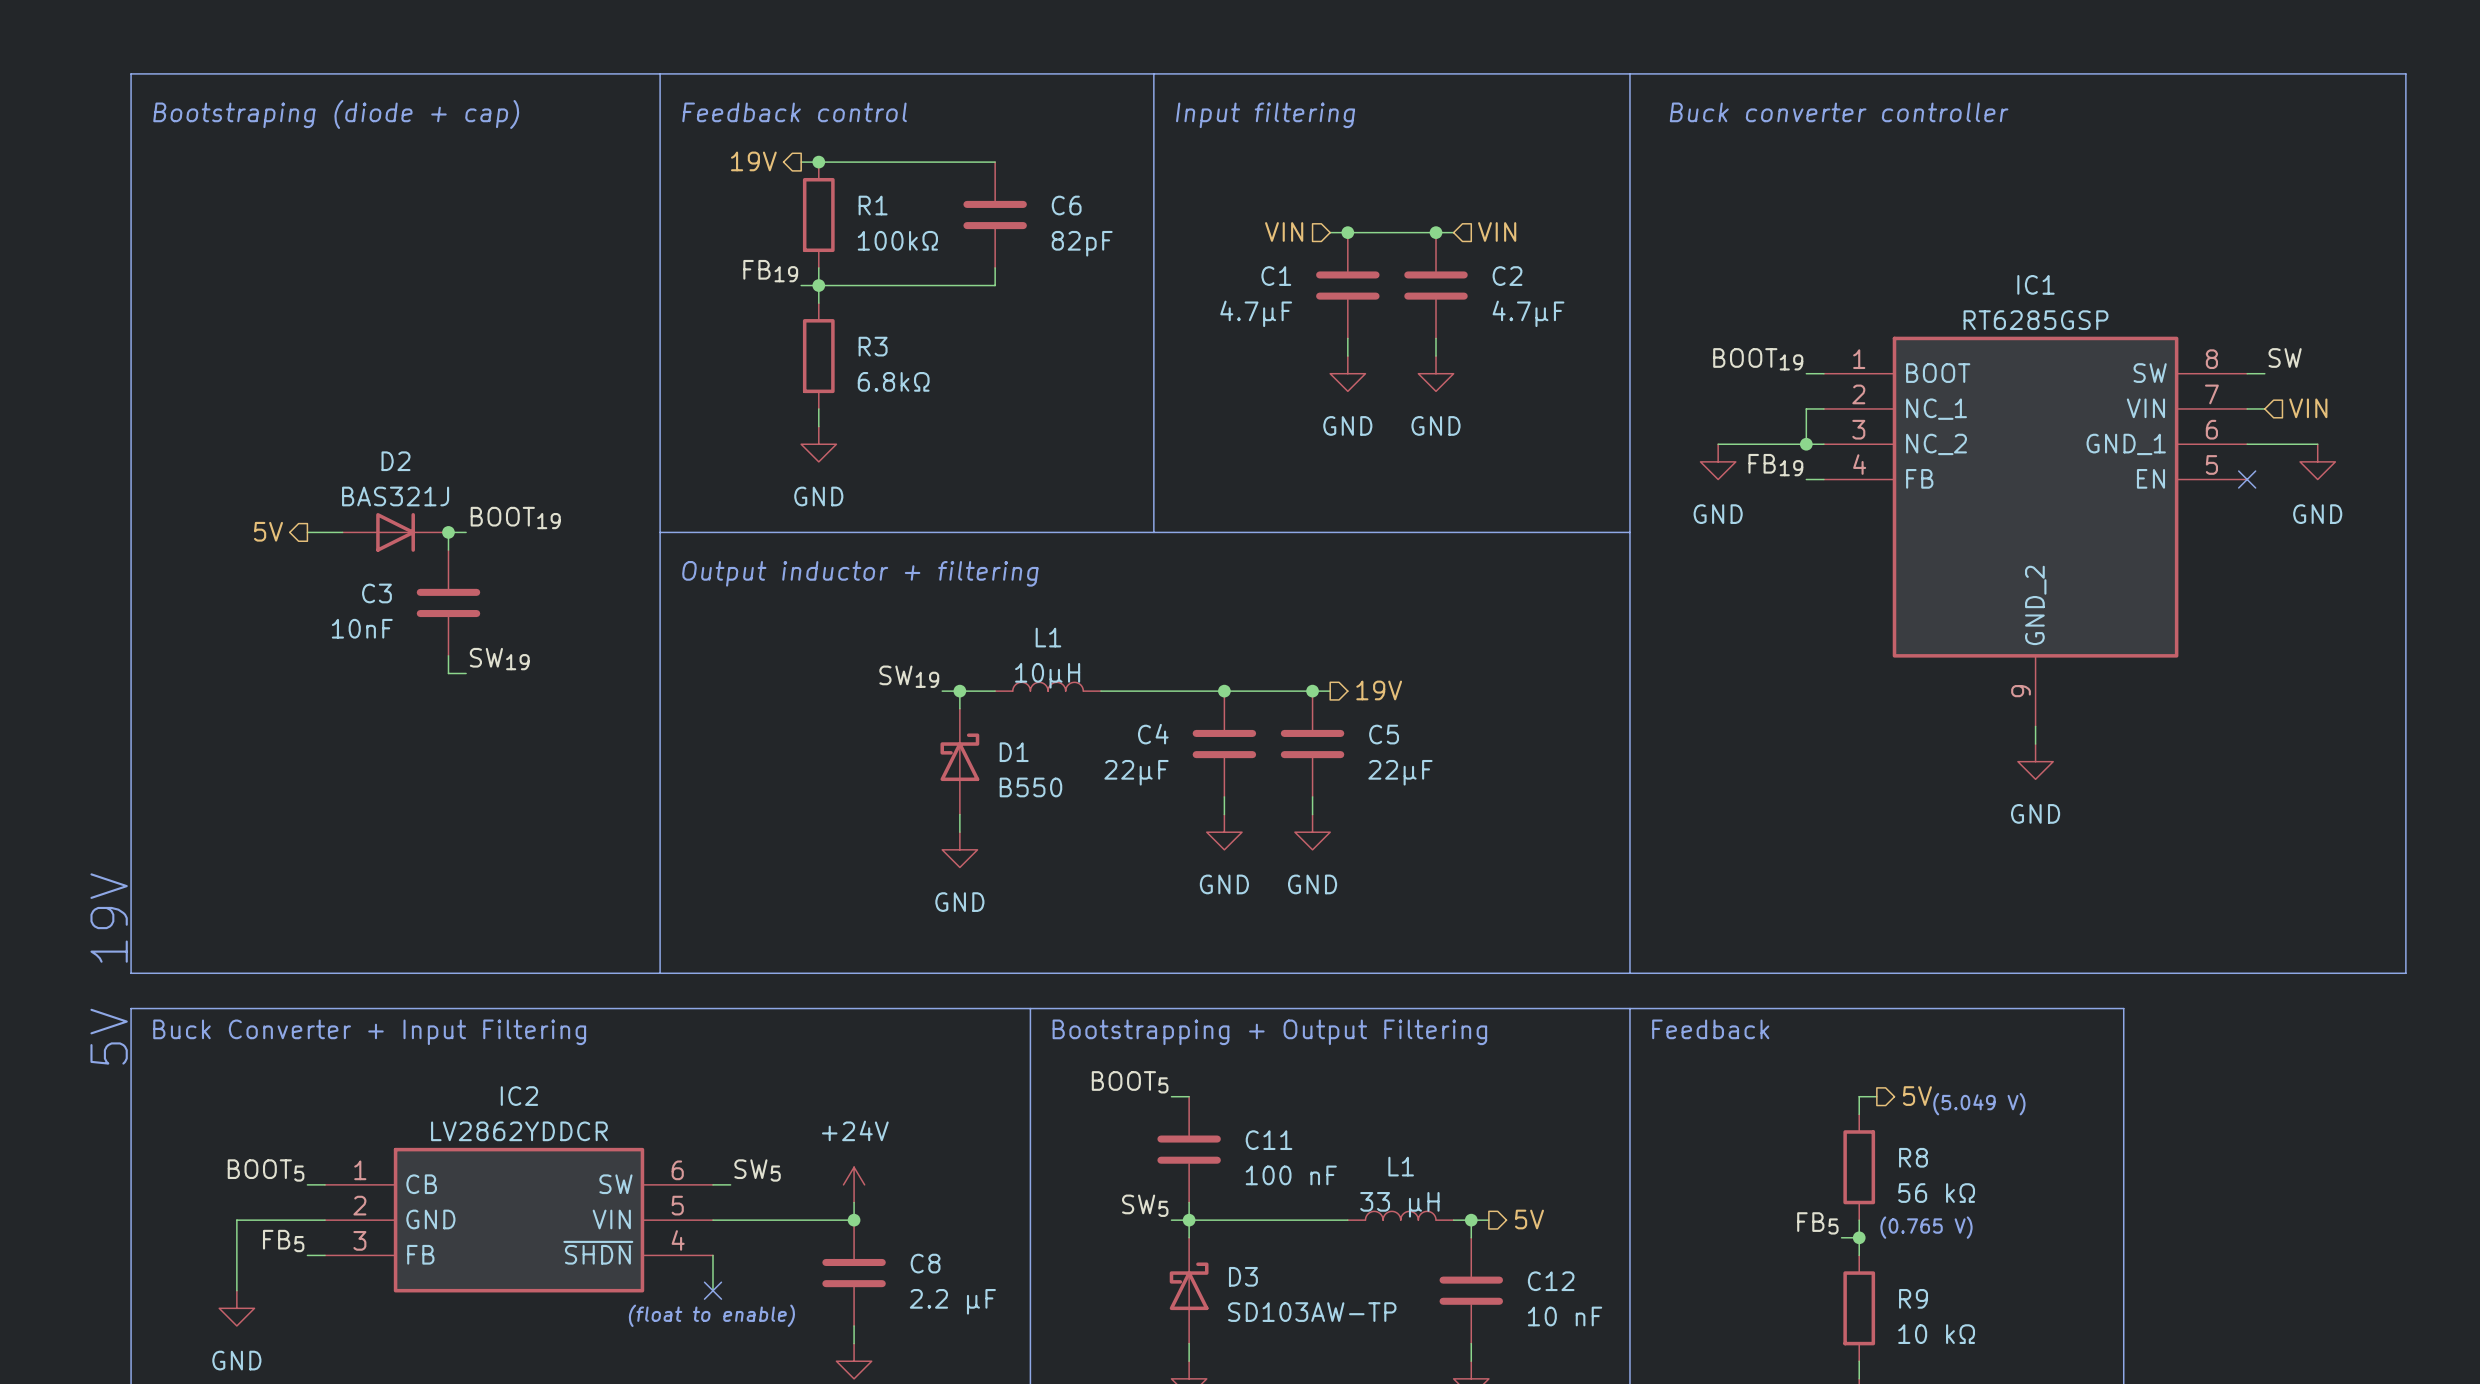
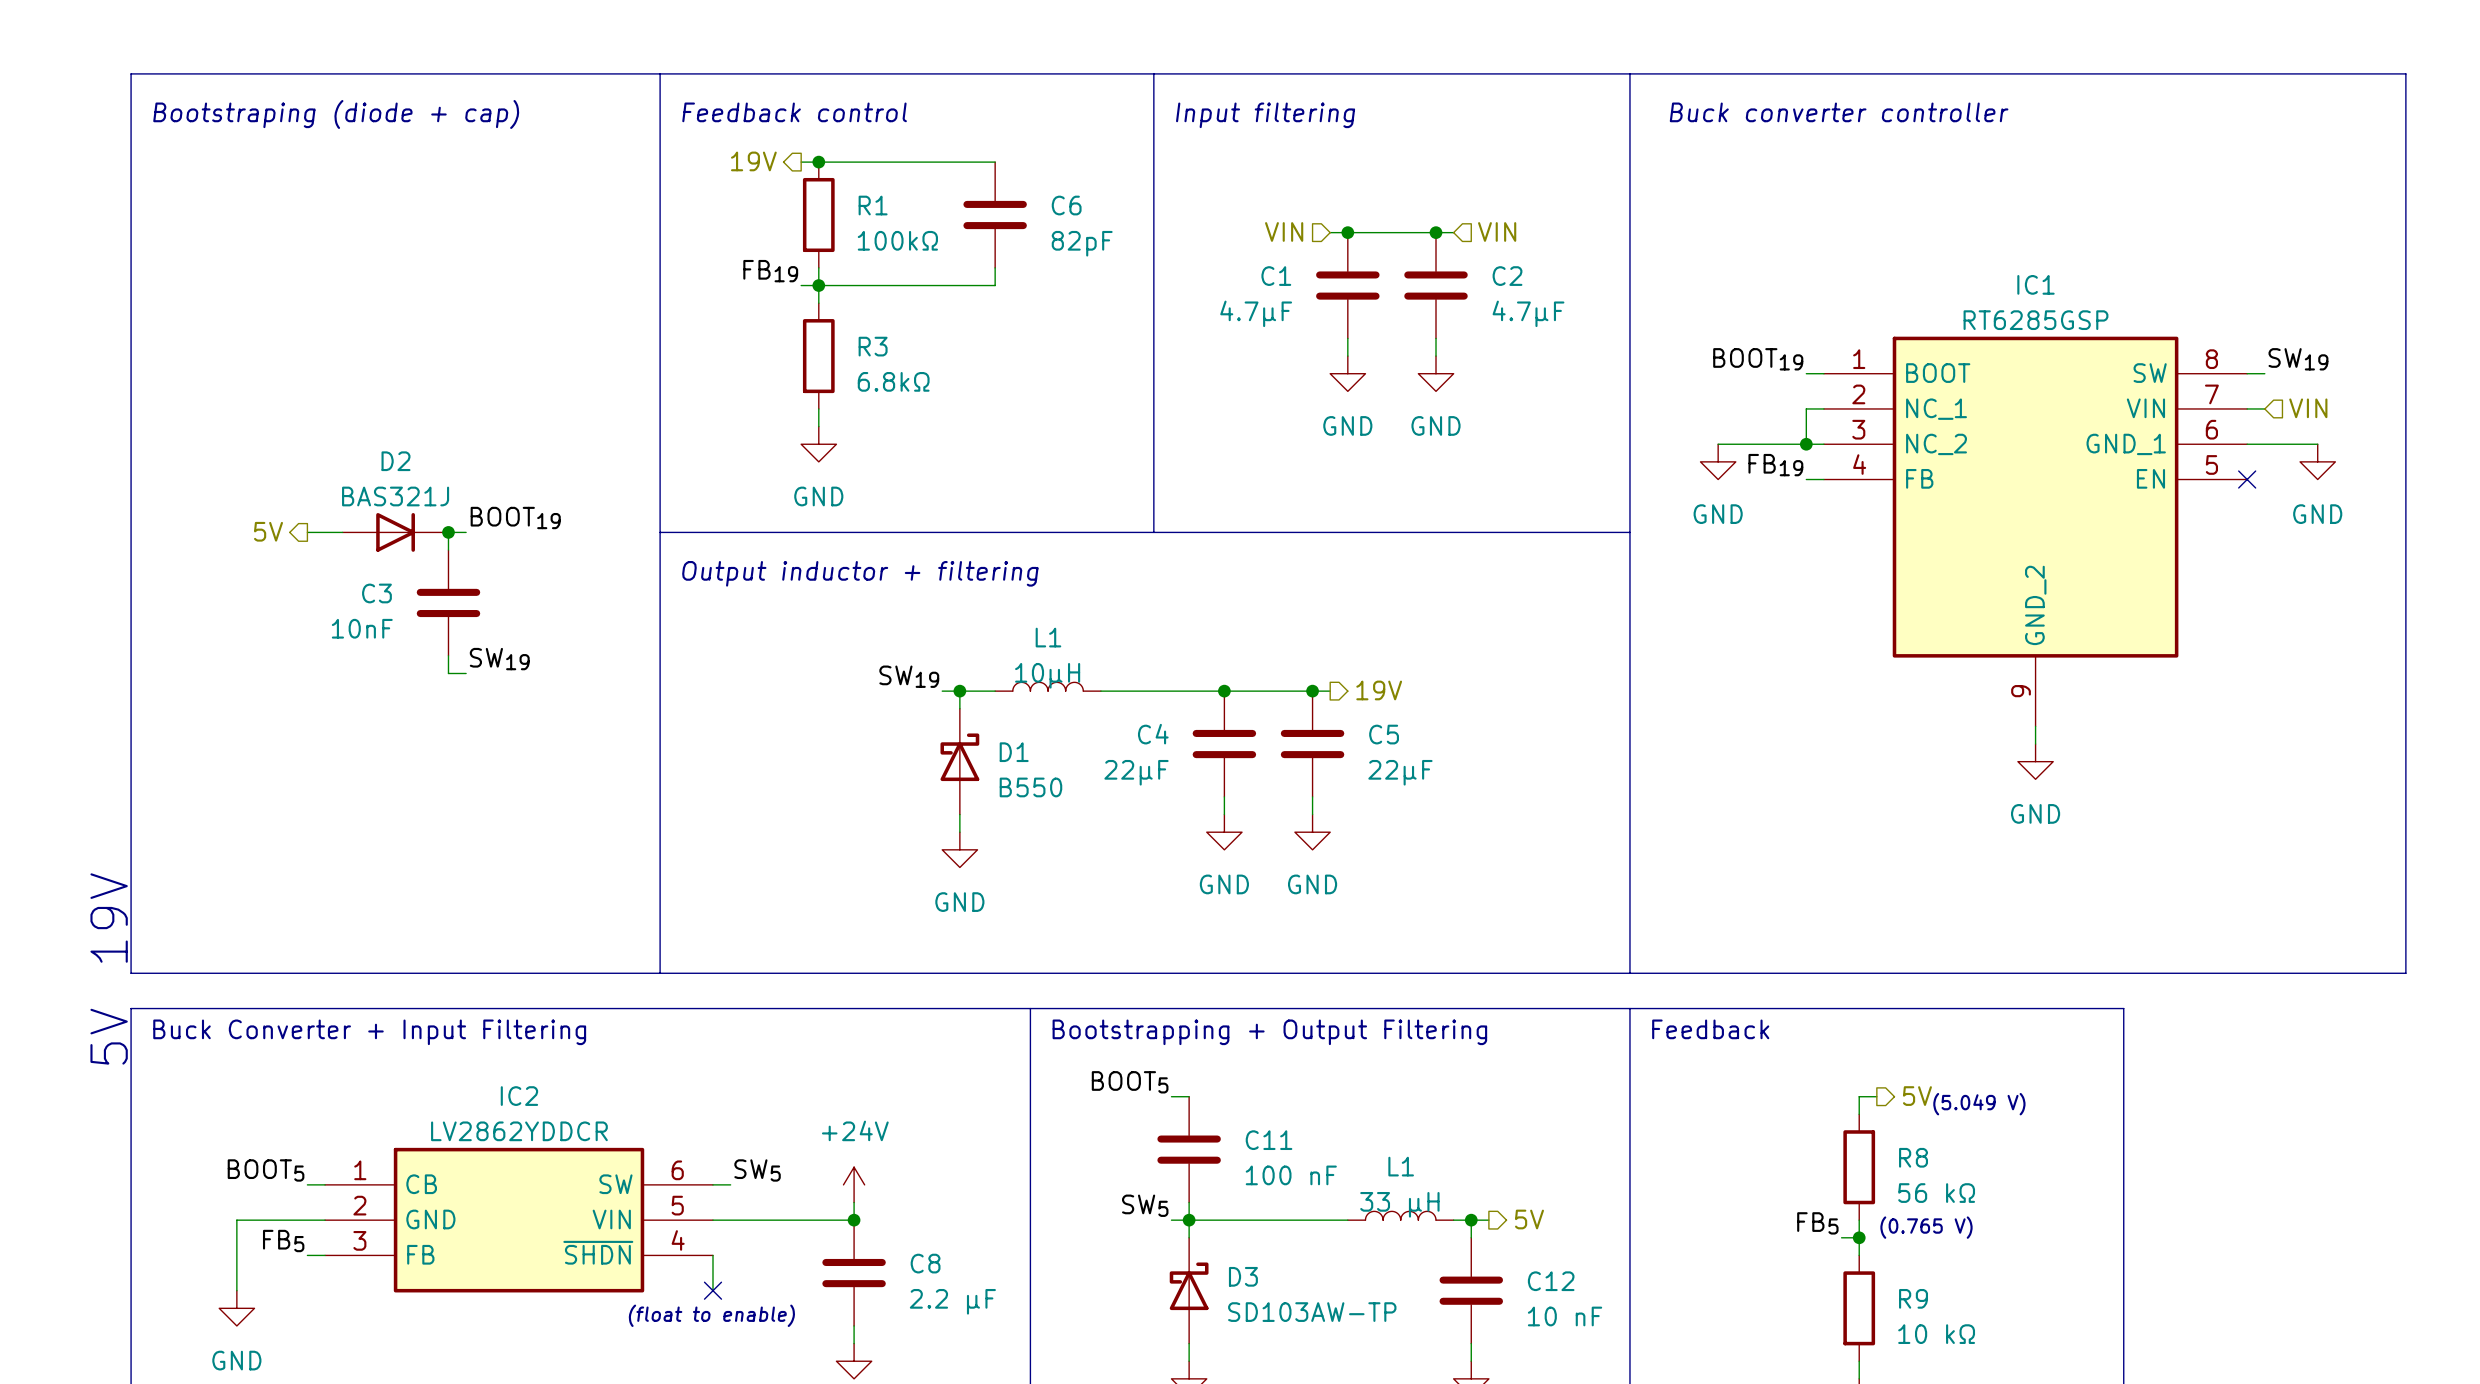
label: SW (2285, 357) -> SW19 (2298, 359)

